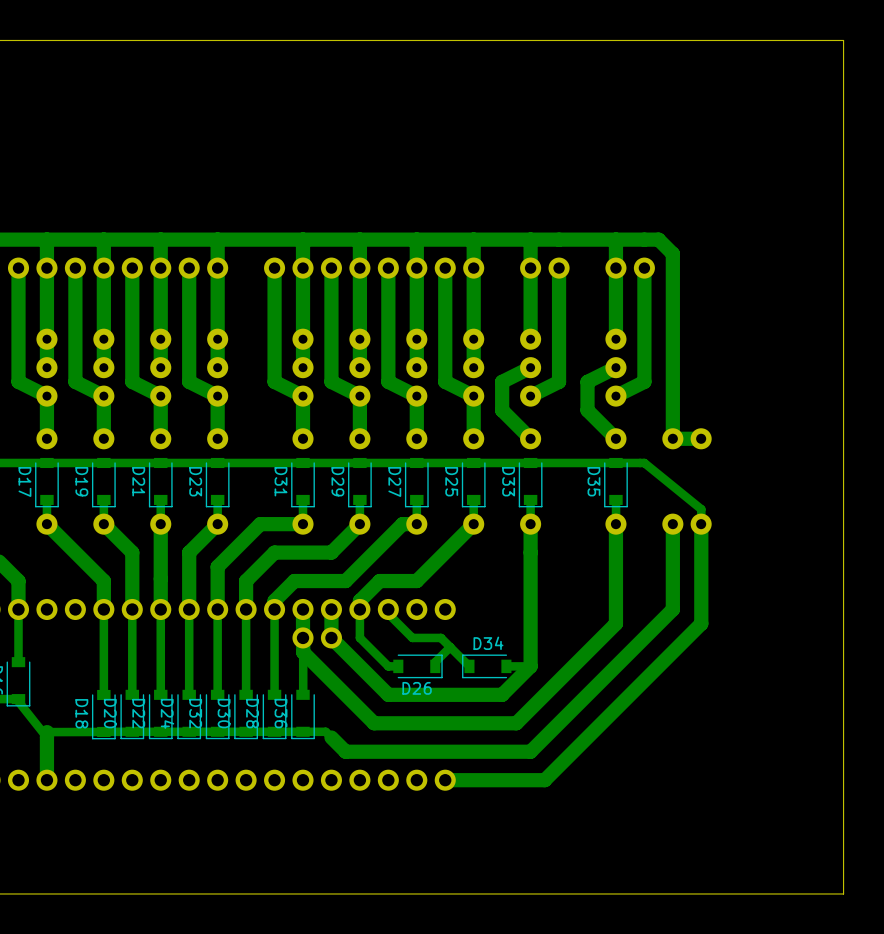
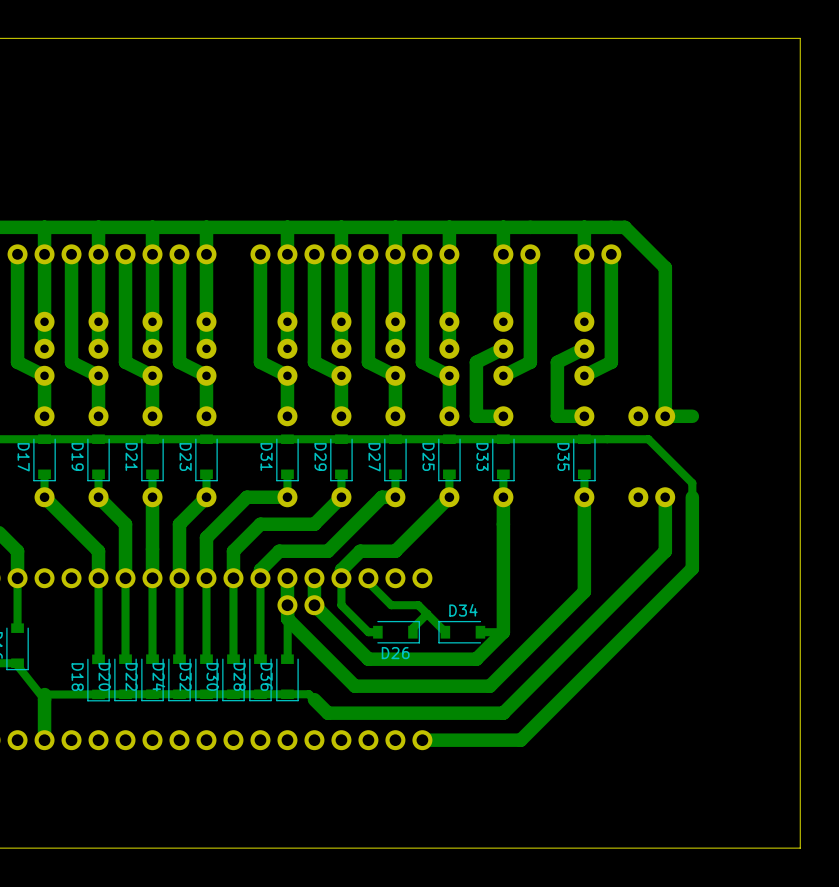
track: (672, 253) (672, 438) (701, 438) -> (638, 240) (665, 267) (665, 416) (692, 416)
track: (502, 410) (530, 438) -> (476, 389) (476, 416) (503, 416)
track: (587, 410) (615, 438) -> (557, 389) (557, 416) (584, 416)
track: (644, 462) (701, 509) (701, 524) -> none
track: (672, 524) (672, 609) -> (665, 551) (638, 578)
track: (701, 581) (701, 623) (544, 780) -> (611, 439) (648, 439) (692, 483) (692, 568) (520, 740) (516, 740)

